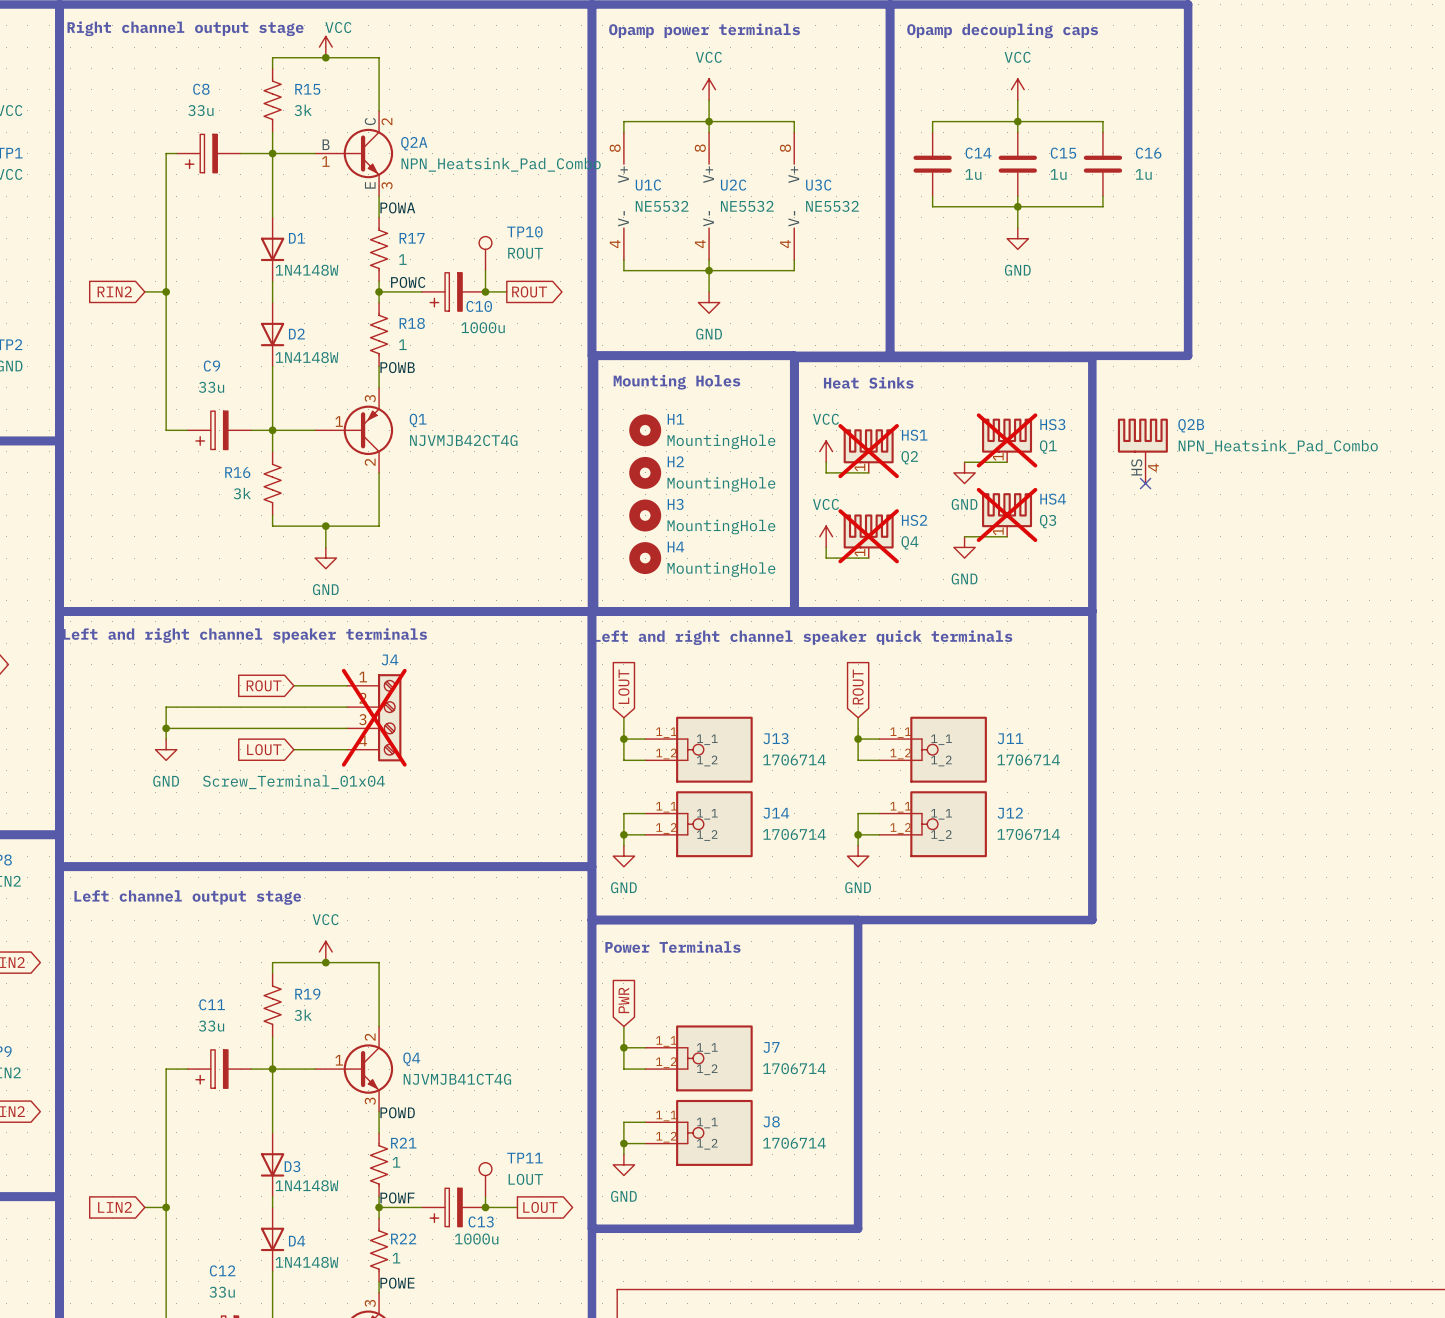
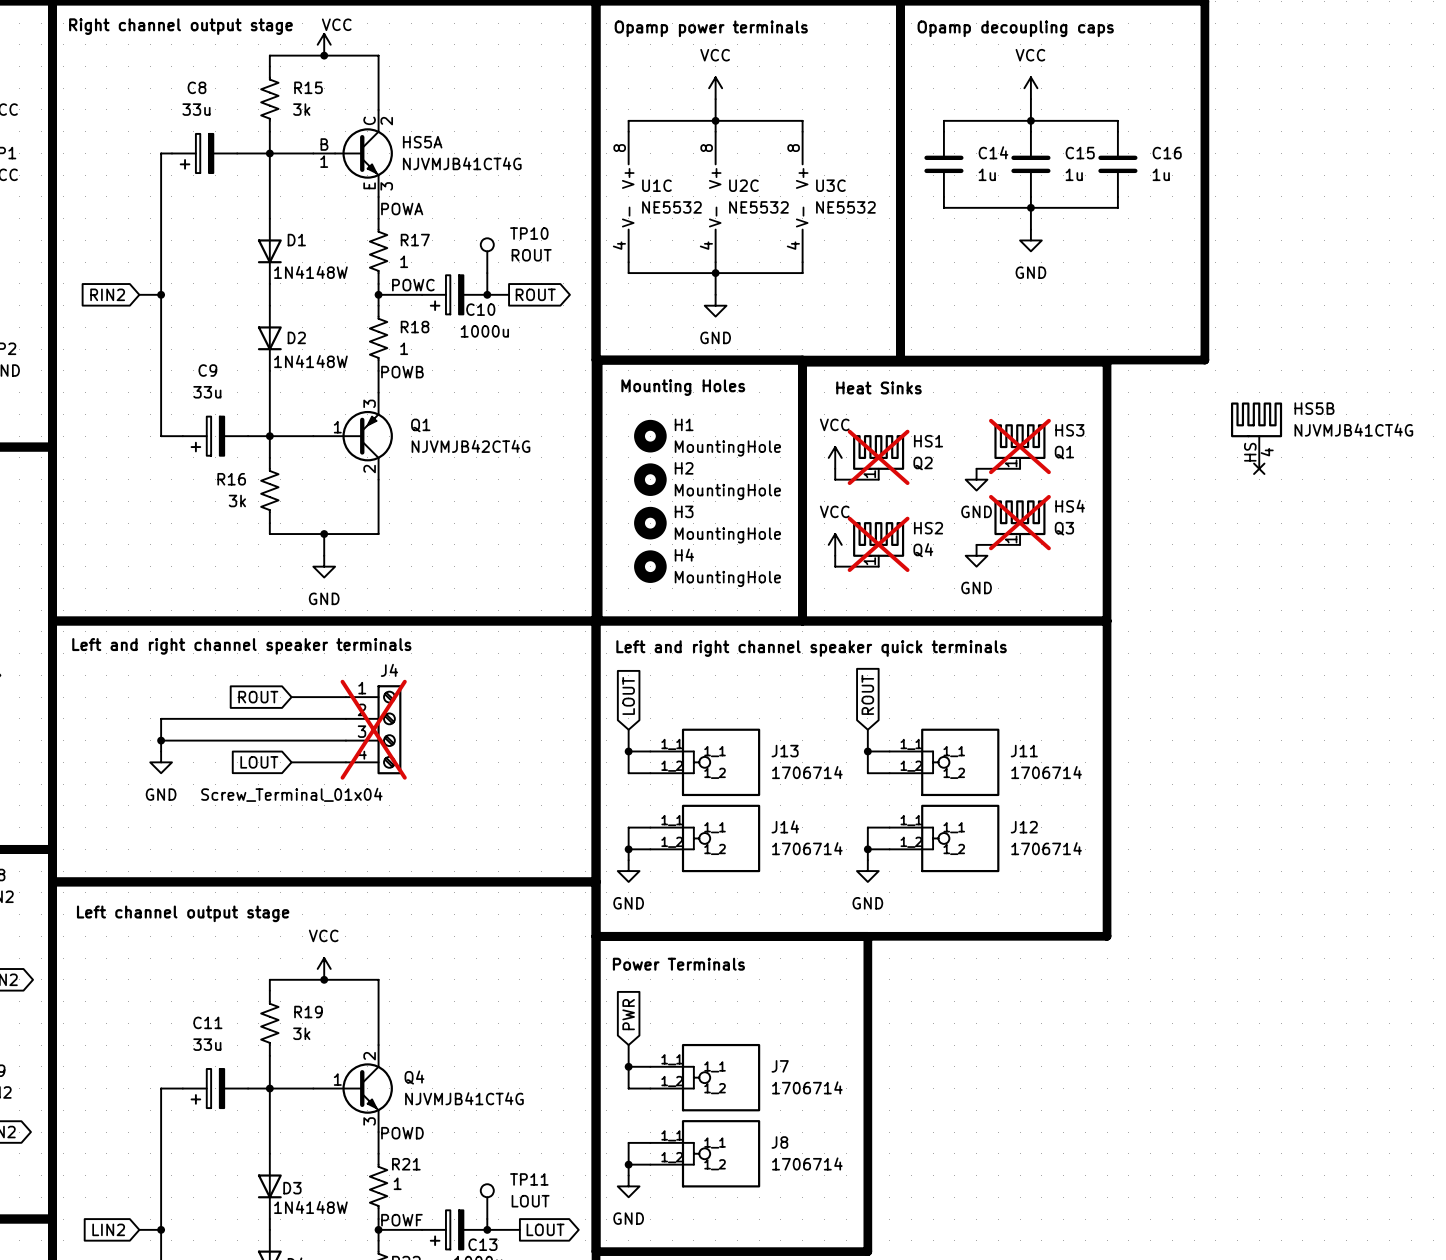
Q2A name: Q2A (414, 143) -> HS5A (422, 142)
Q2A value: NPN_Heatsink_Pad_Combo (501, 164) -> NJVMJB41CT4G (462, 163)
HS5B: none -> NJVMJB41CT4G (1256, 435)
Q2B: NPN_Heatsink_Pad_Combo (1142, 451) -> none
no-connect mark: none -> (1259, 468)
no-connect mark: (1145, 483) -> none

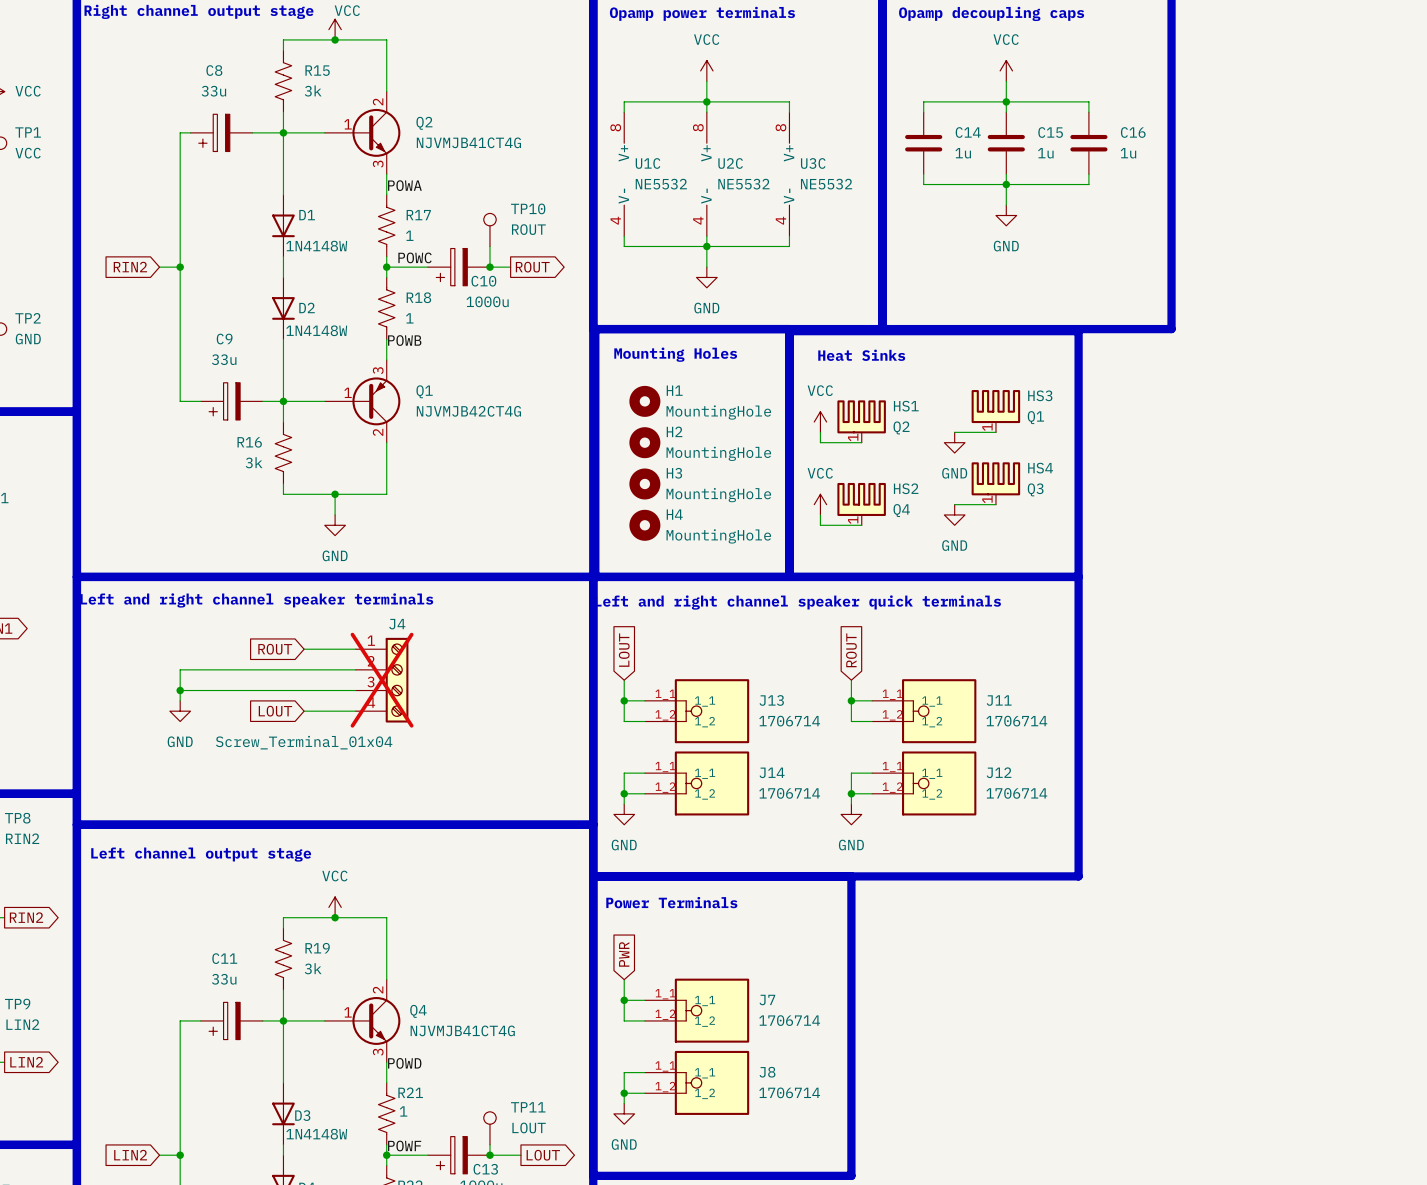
HS5A: NJVMJB41CT4G (353, 153) -> none
Q2: none -> NJVMJB41CT4G (362, 132)
HS5B: NJVMJB41CT4G (1256, 435) -> none
HS3 do-not-place cross: (1019, 446) -> none
HS1 do-not-place cross: (878, 457) -> none
no-connect mark: (1259, 468) -> none
HS4 do-not-place cross: (1019, 522) -> none
HS2 do-not-place cross: (878, 544) -> none

